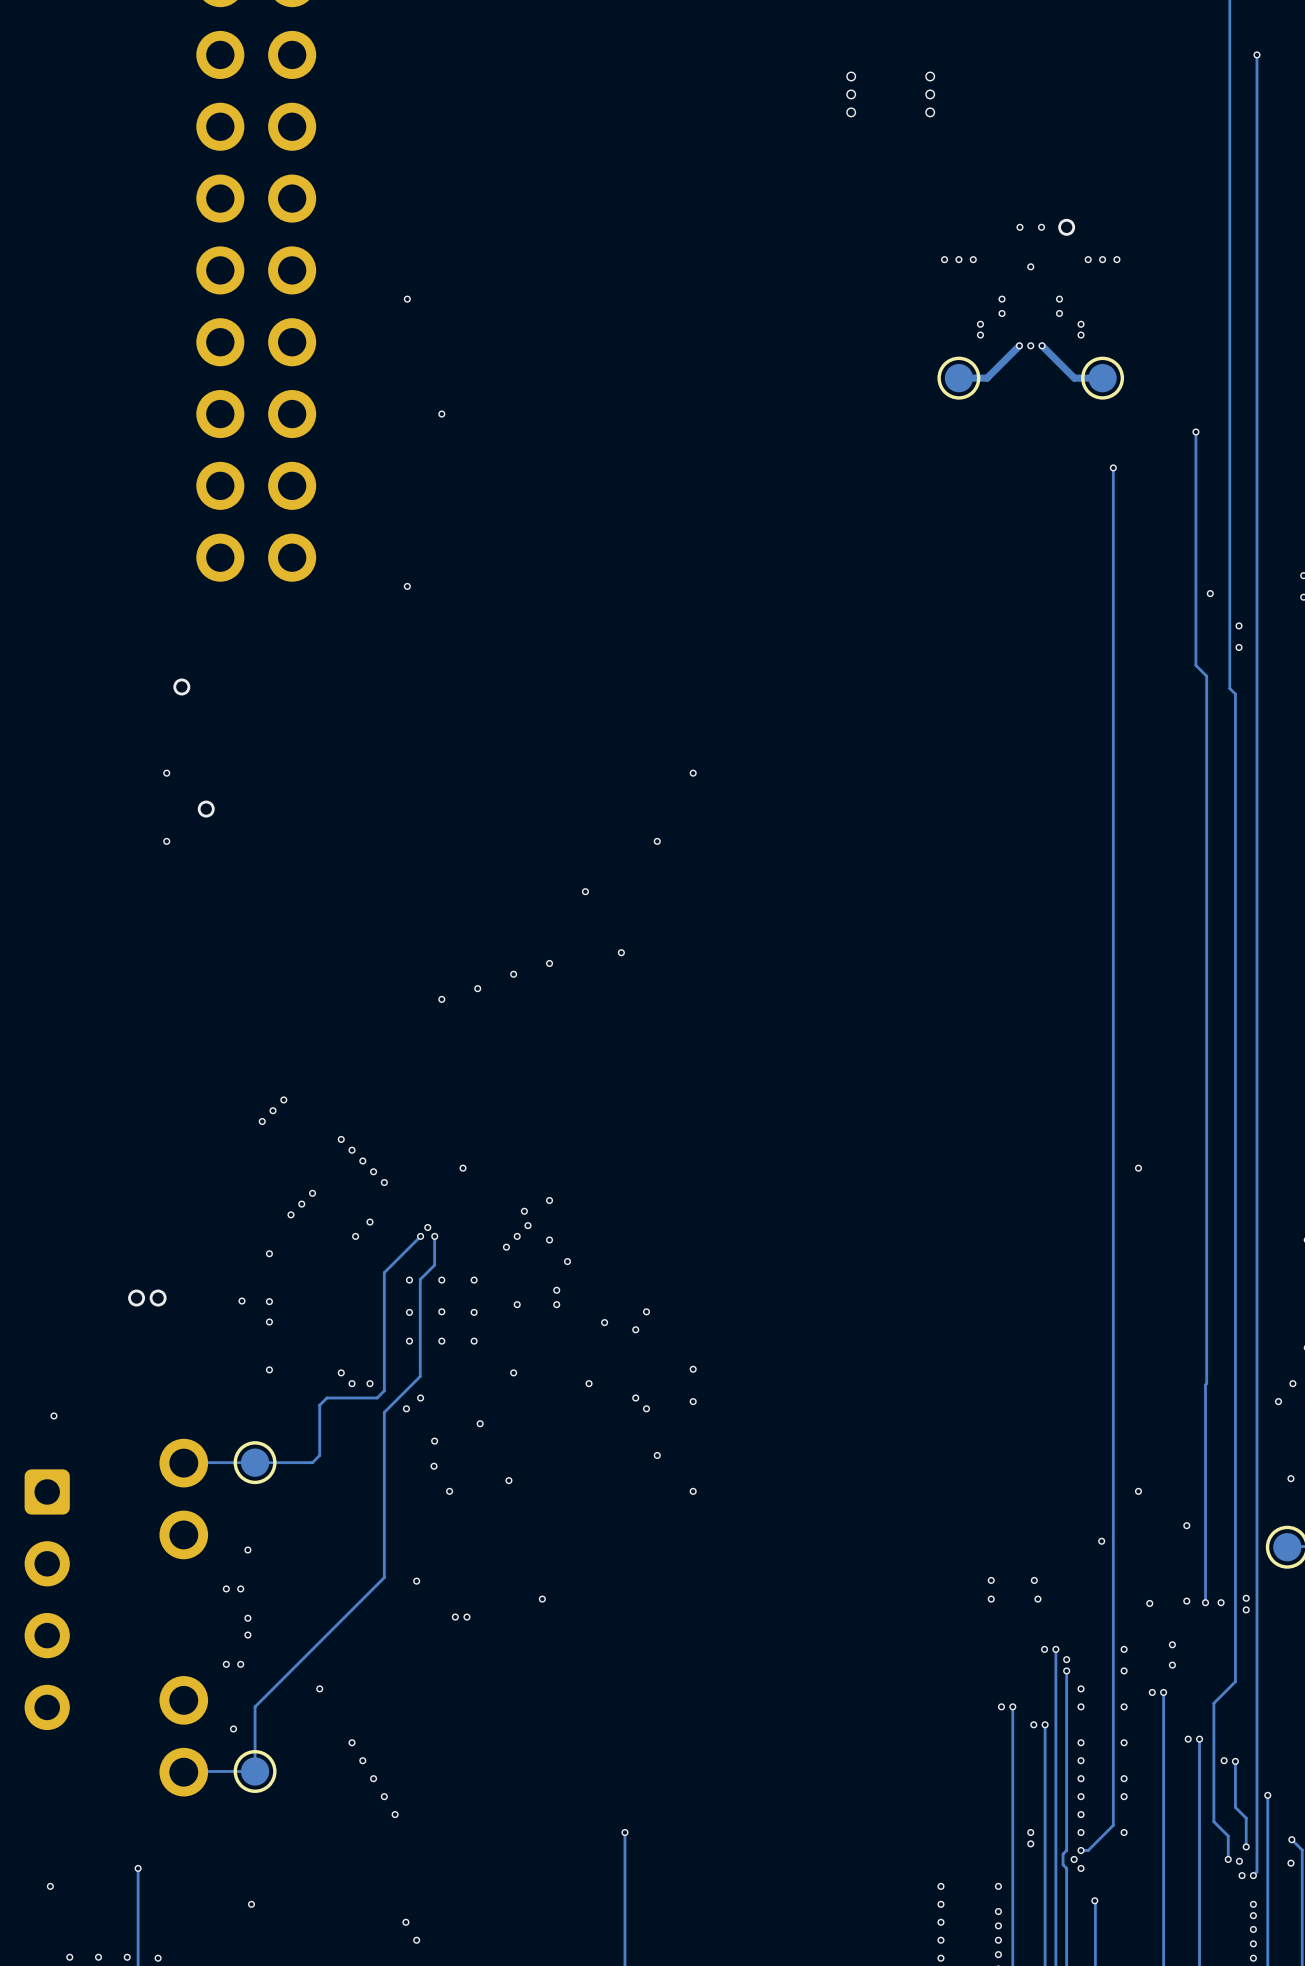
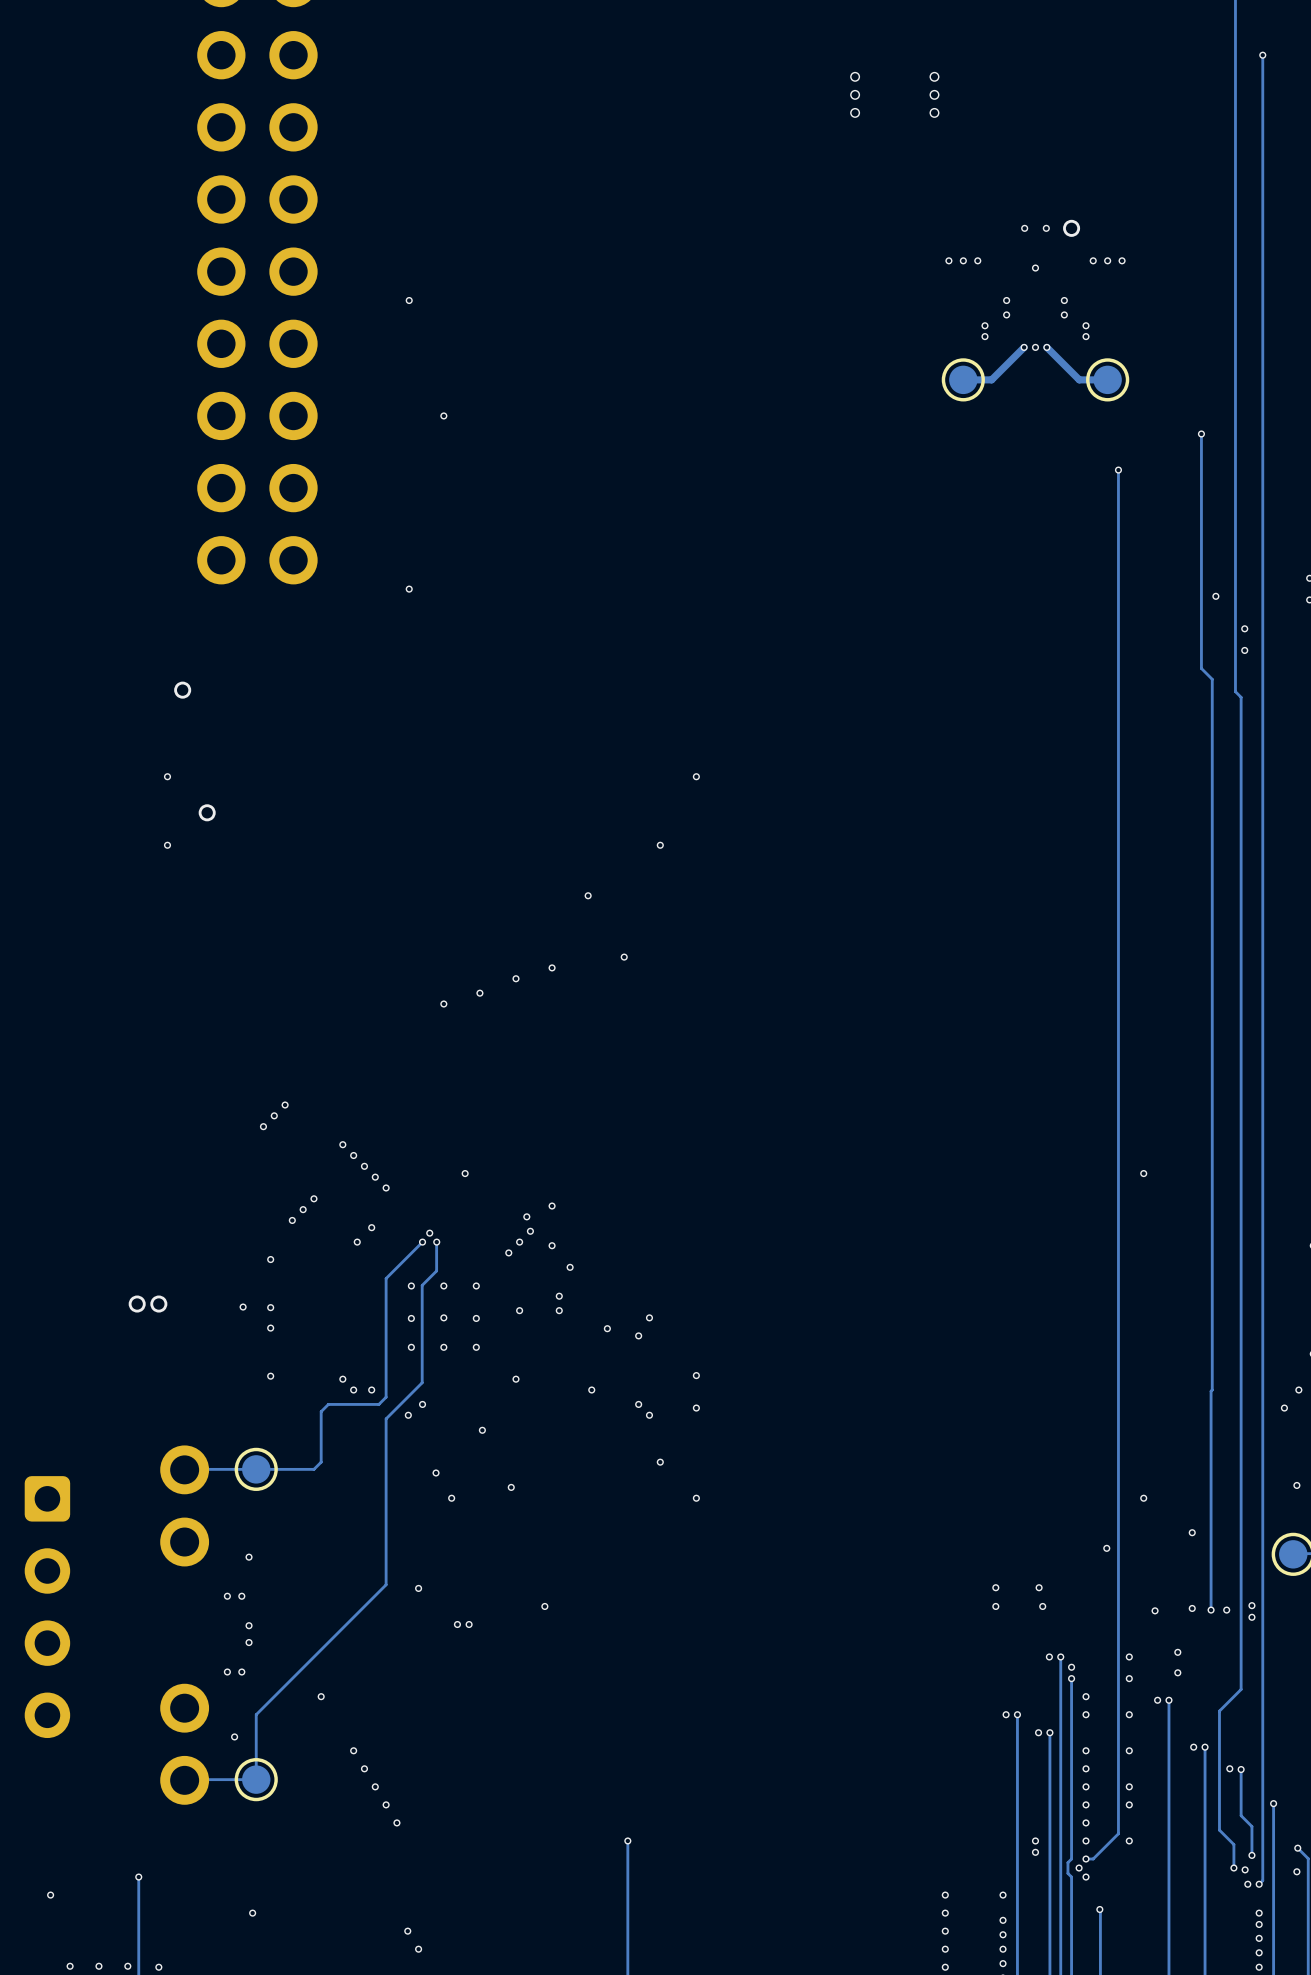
via: (53, 1415) -> none
via: (434, 1441) -> none

